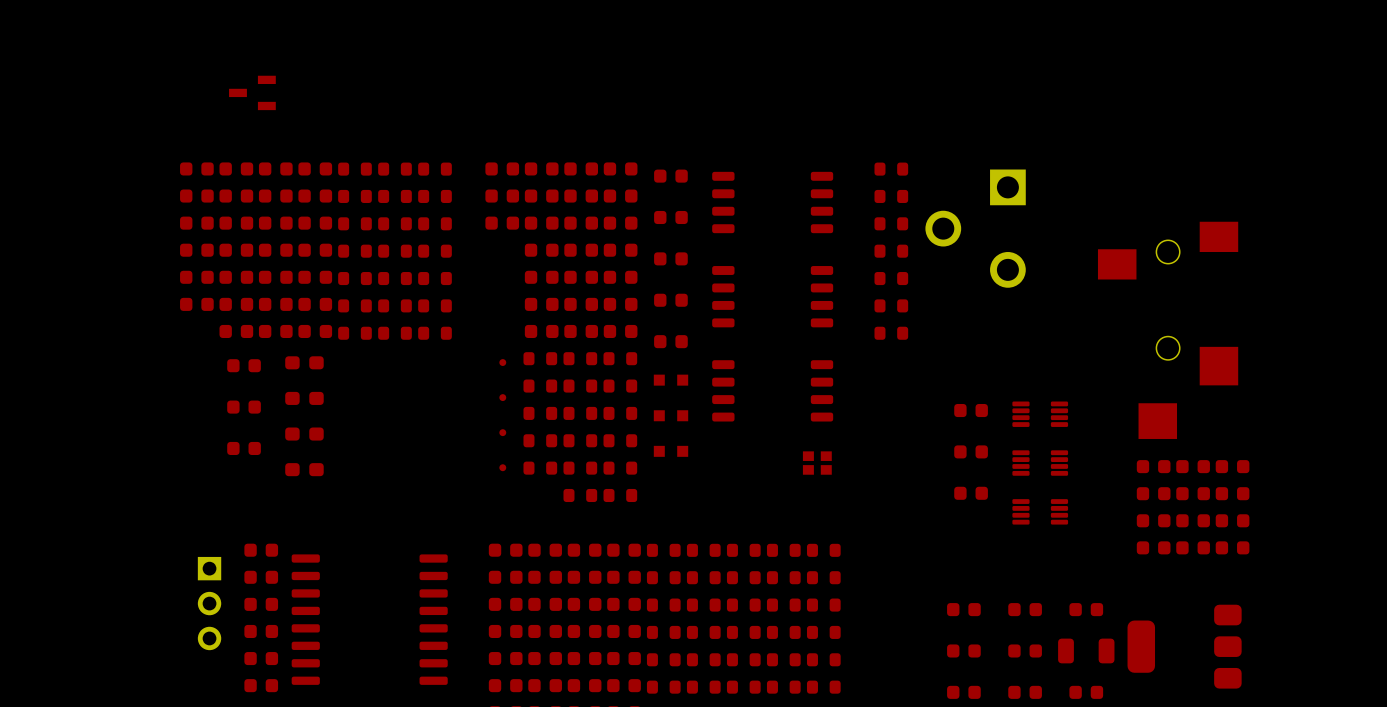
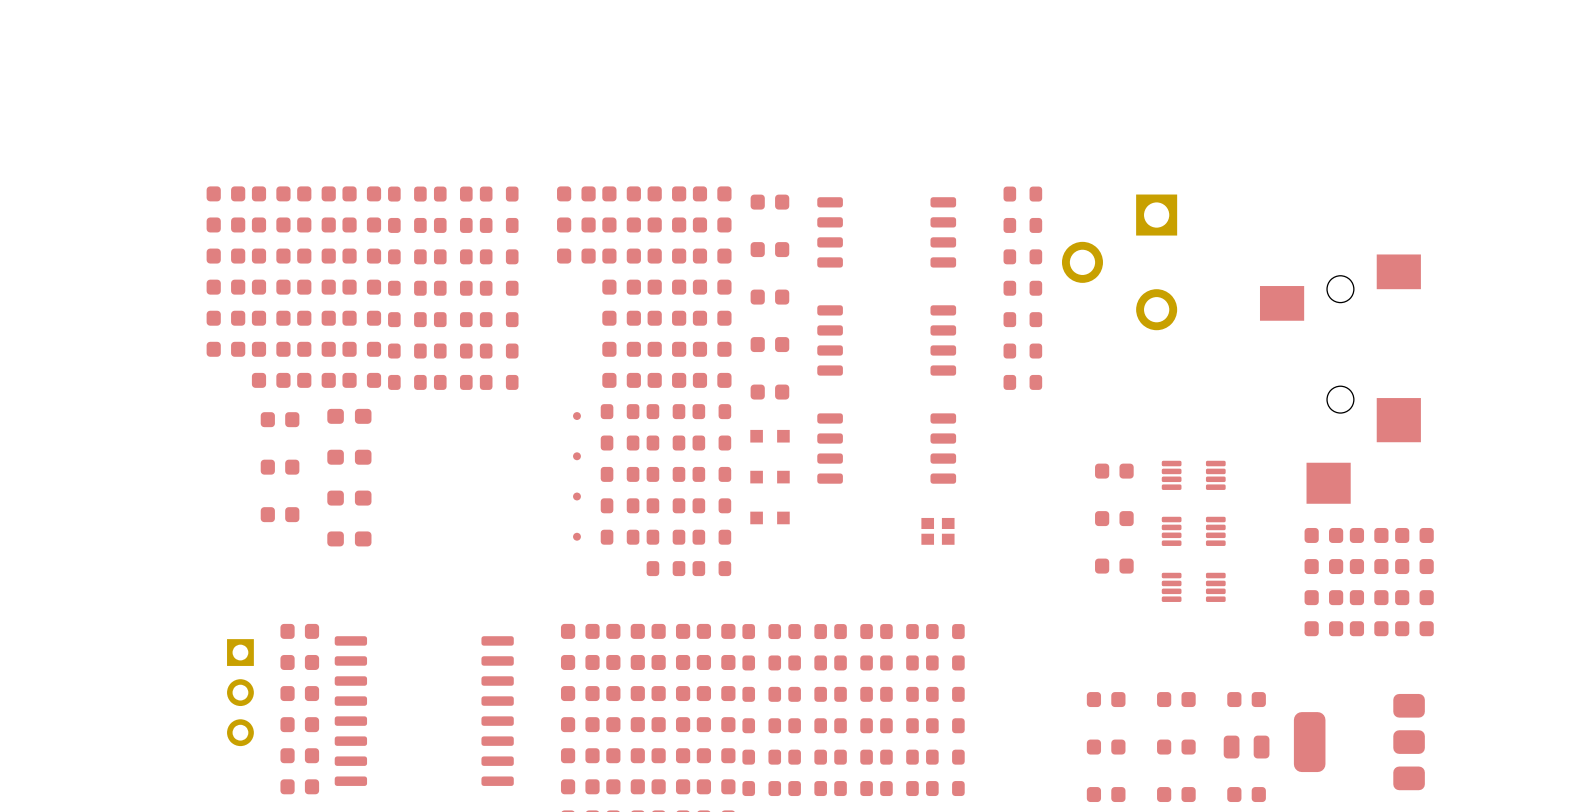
part: (252, 92) -> none
part footprint: [1058, 638, 1115, 664] -> [1223, 735, 1270, 759]

